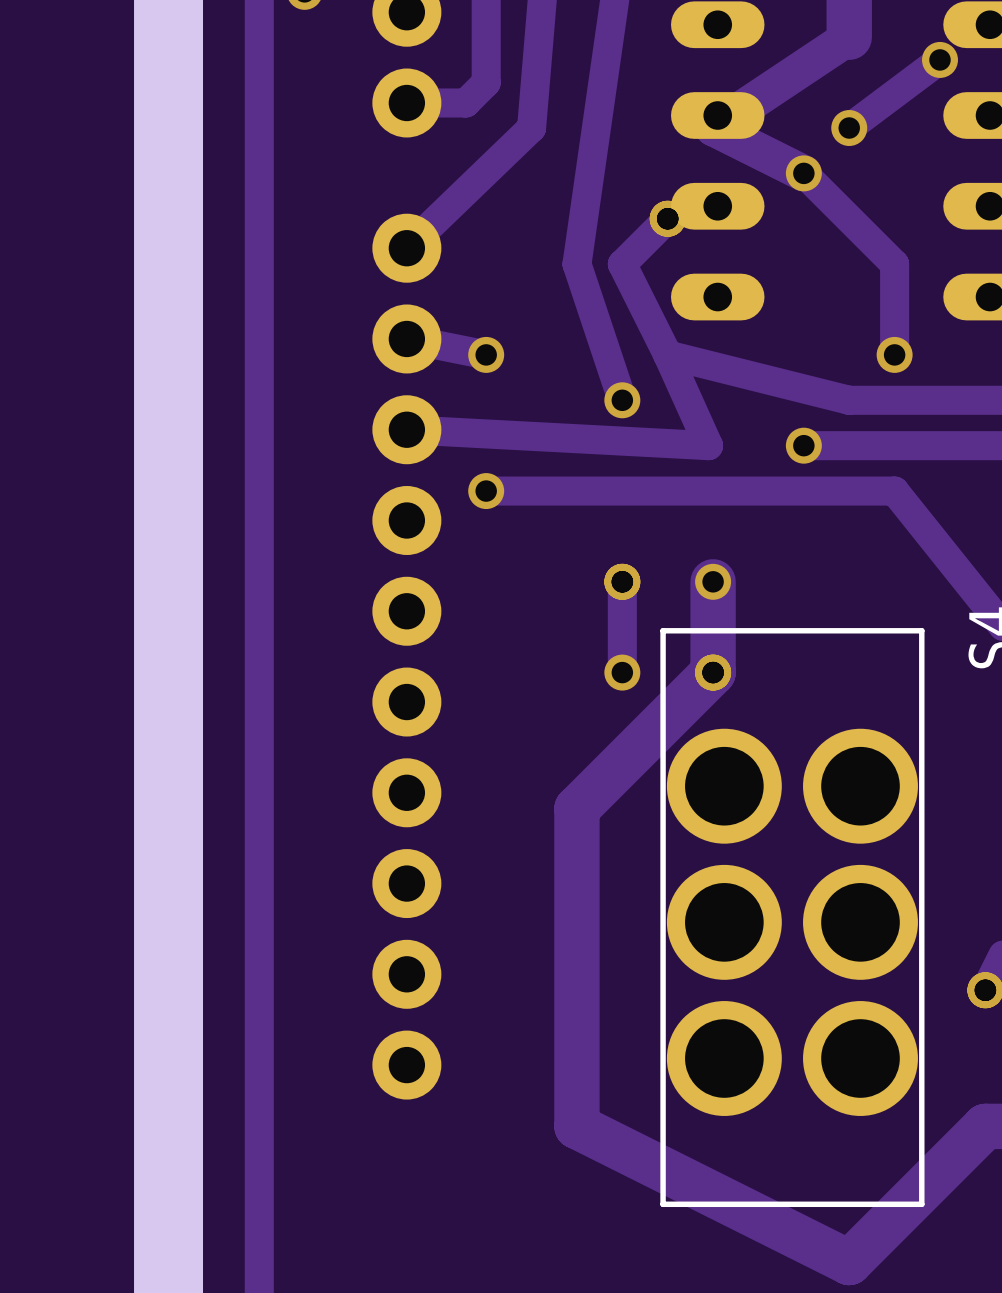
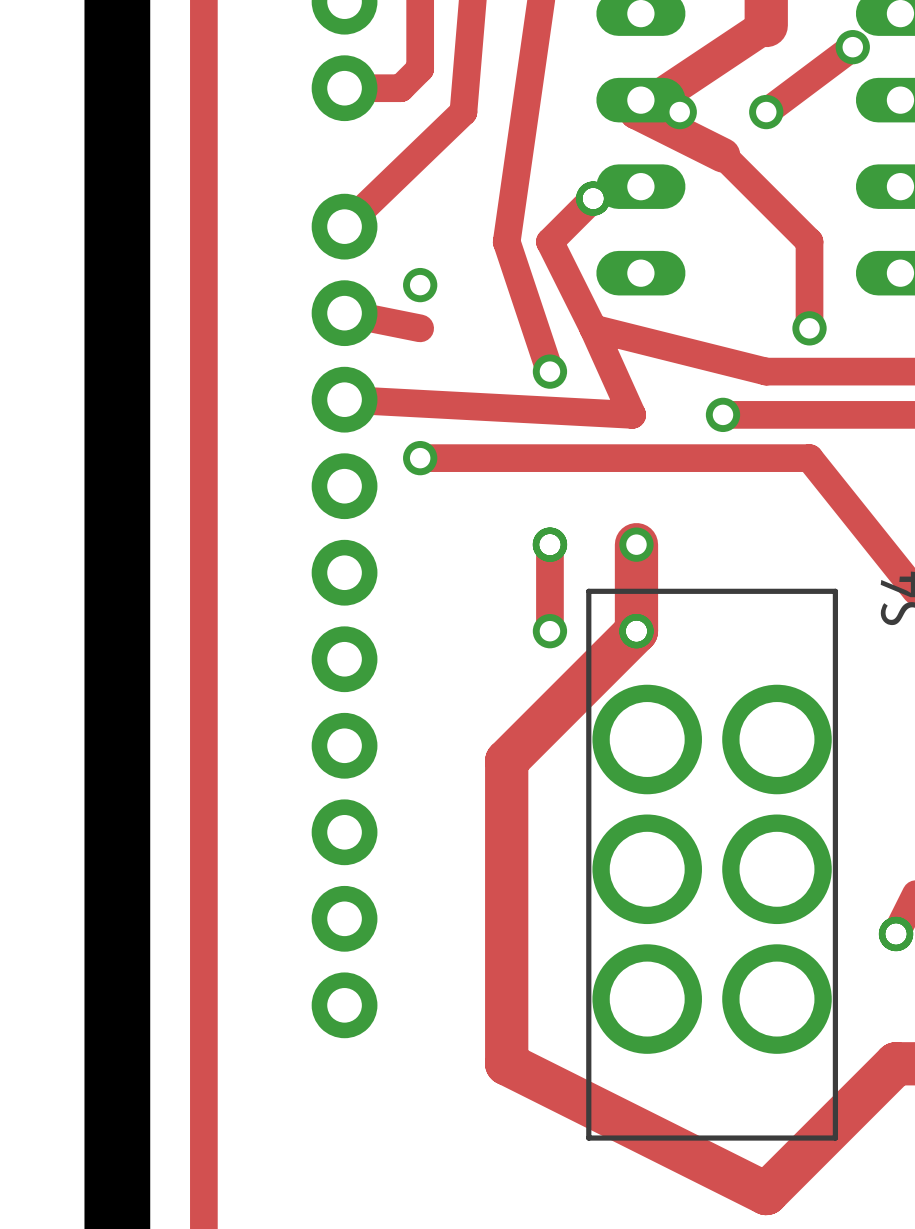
via position: (803, 173) -> (679, 112)
via position: (486, 354) -> (420, 285)

